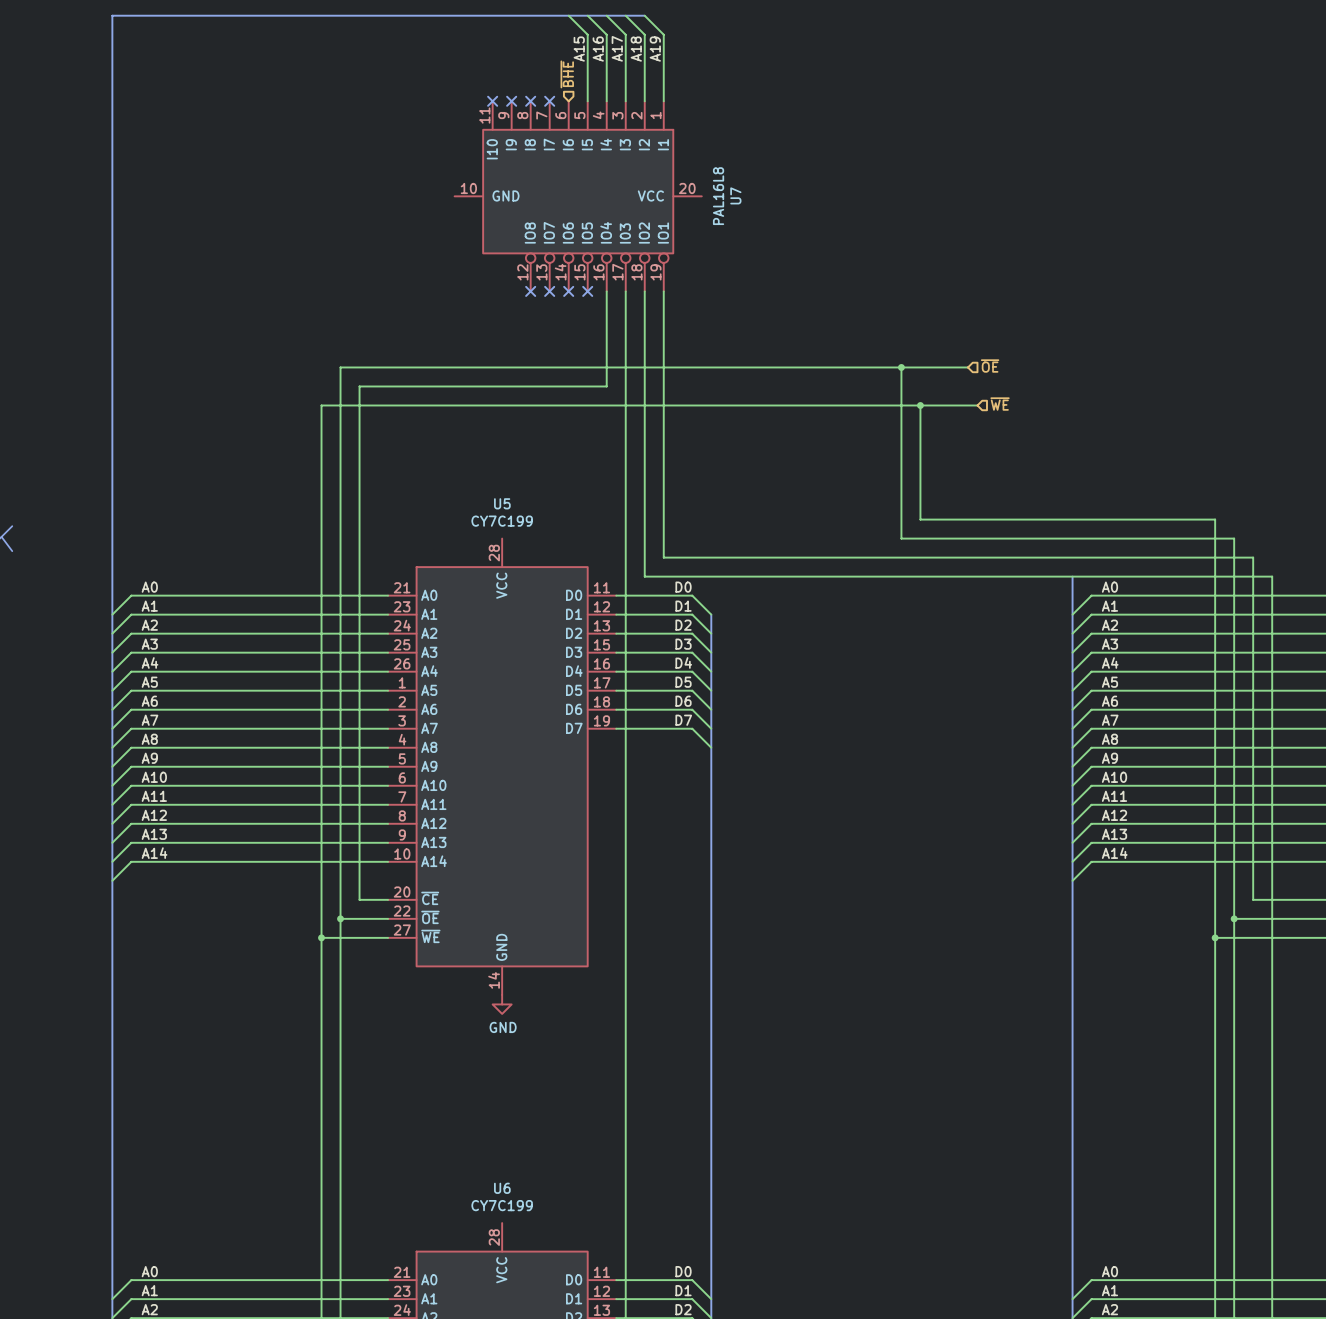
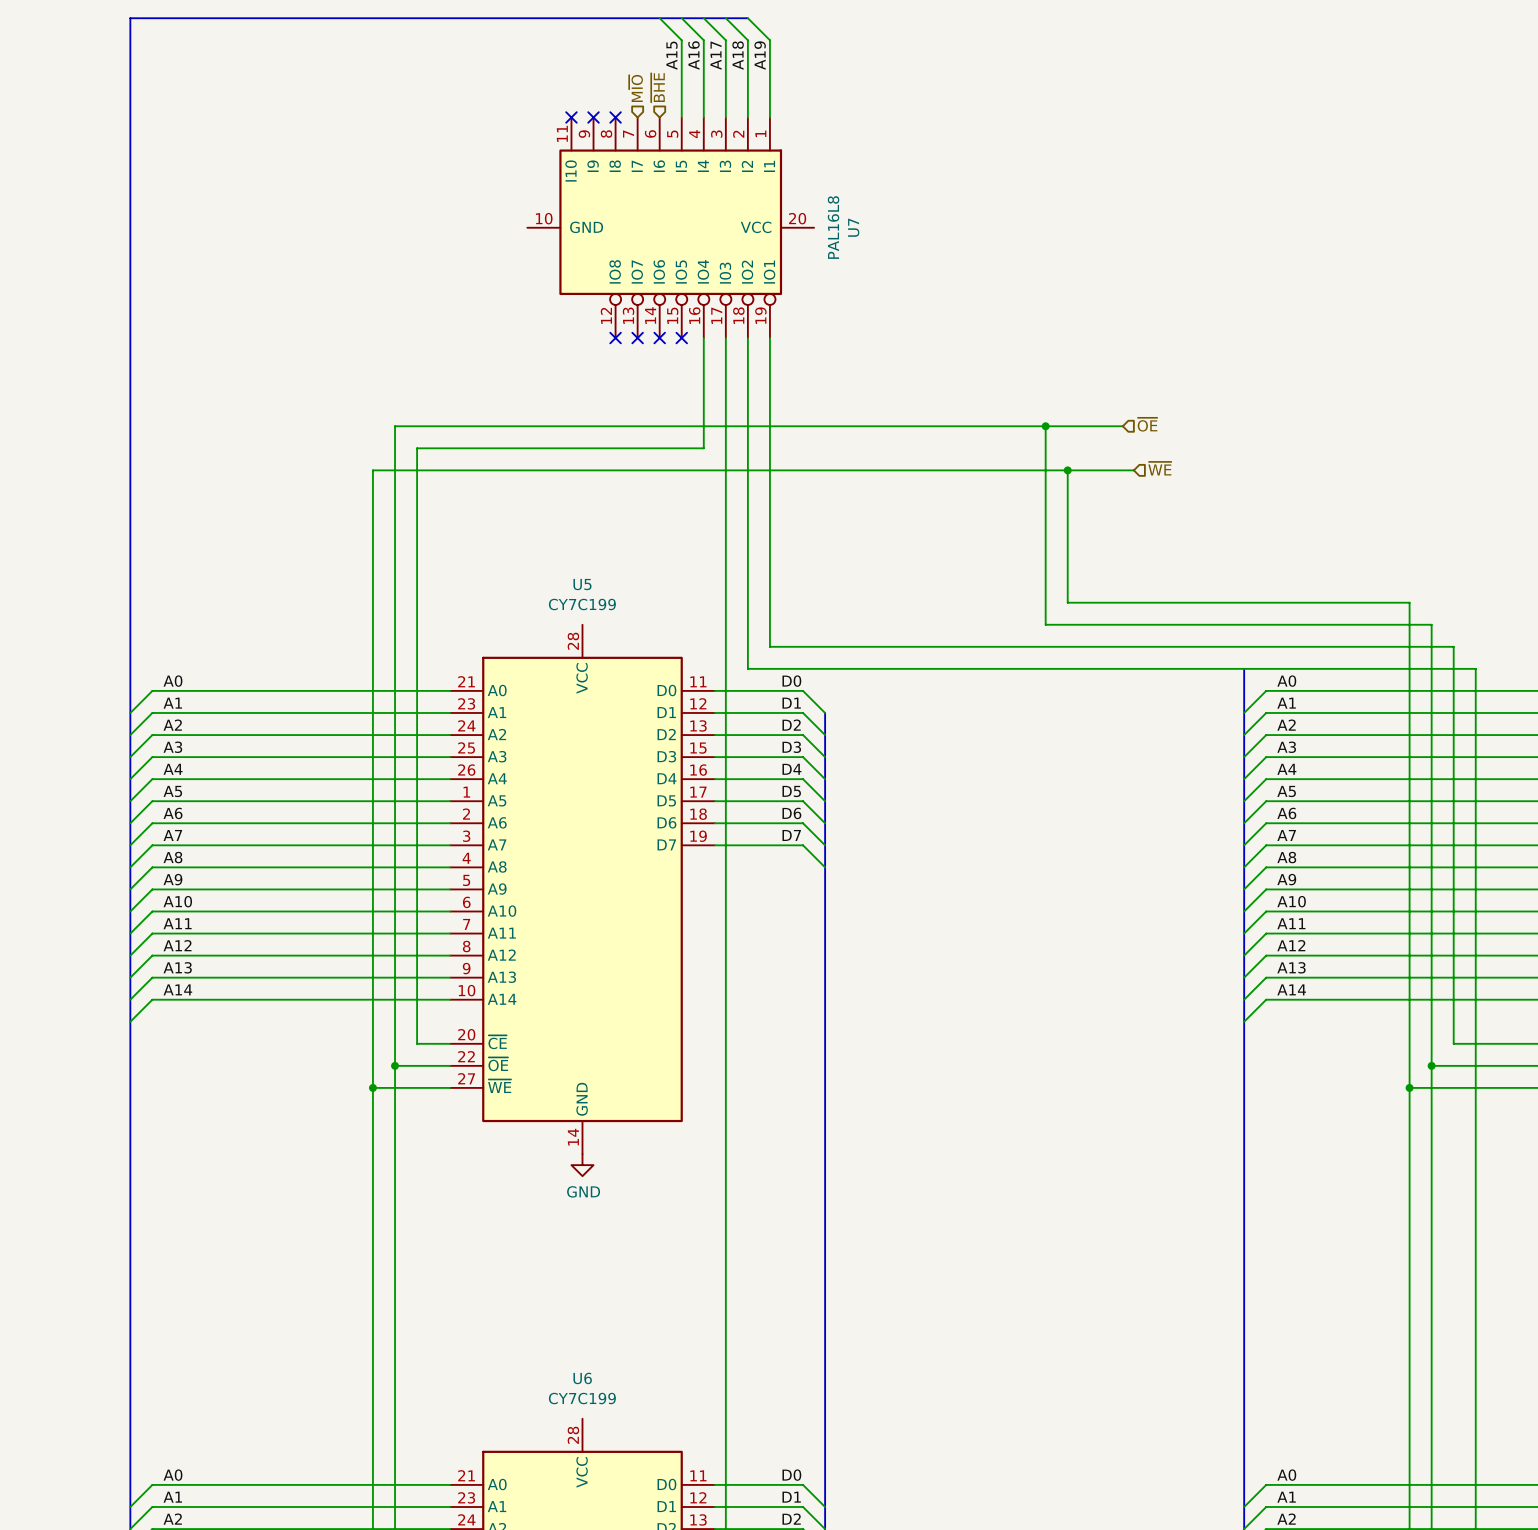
hierarchical label: none -> M~{IO} (636, 88)
no-connect mark: (549, 101) -> none

